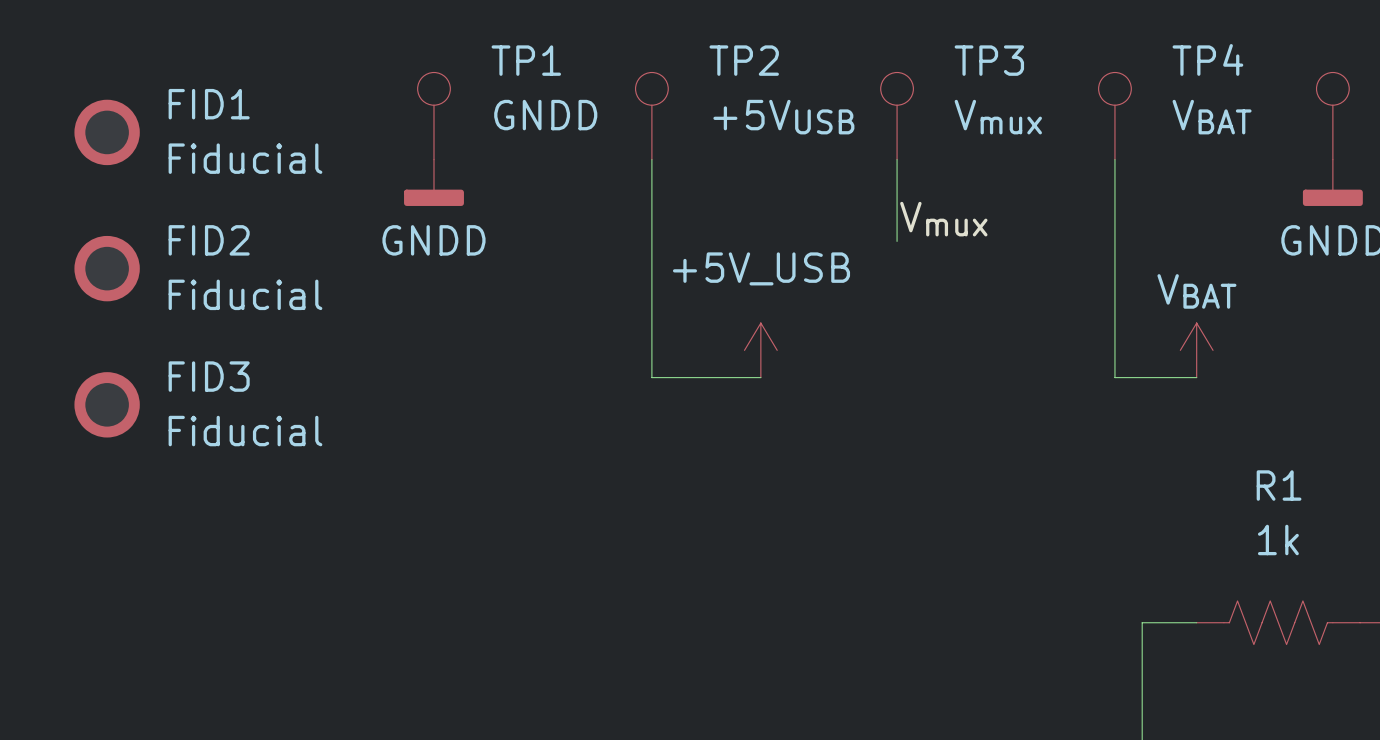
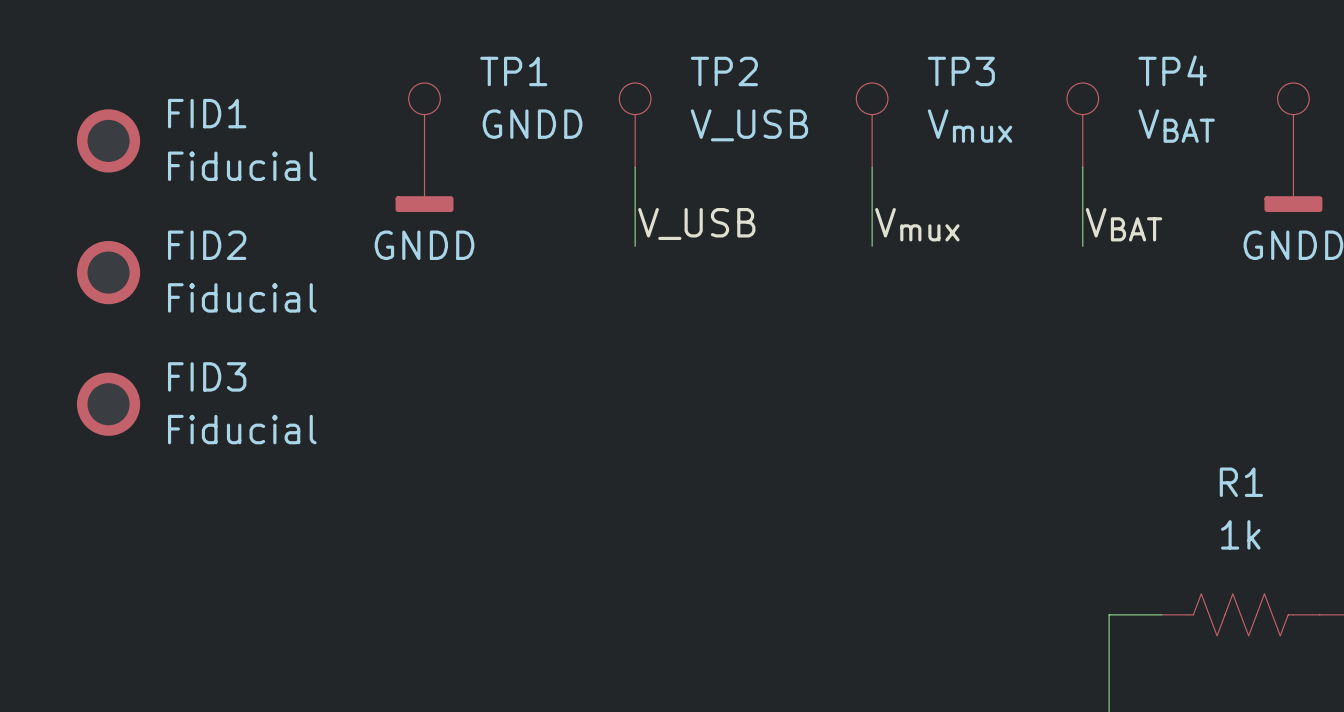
TP2 value: +5VUSB (783, 117) -> V_USB (749, 125)
label: none -> V_USB (696, 223)
label: none -> VBAT (1123, 224)
wire: (651, 241) (651, 377) (760, 377) -> none
wire: (1114, 241) (1114, 377) (1196, 377) -> none
power symbol: +5V_USB (760, 350) -> none
power symbol: VBAT (1196, 350) -> none

